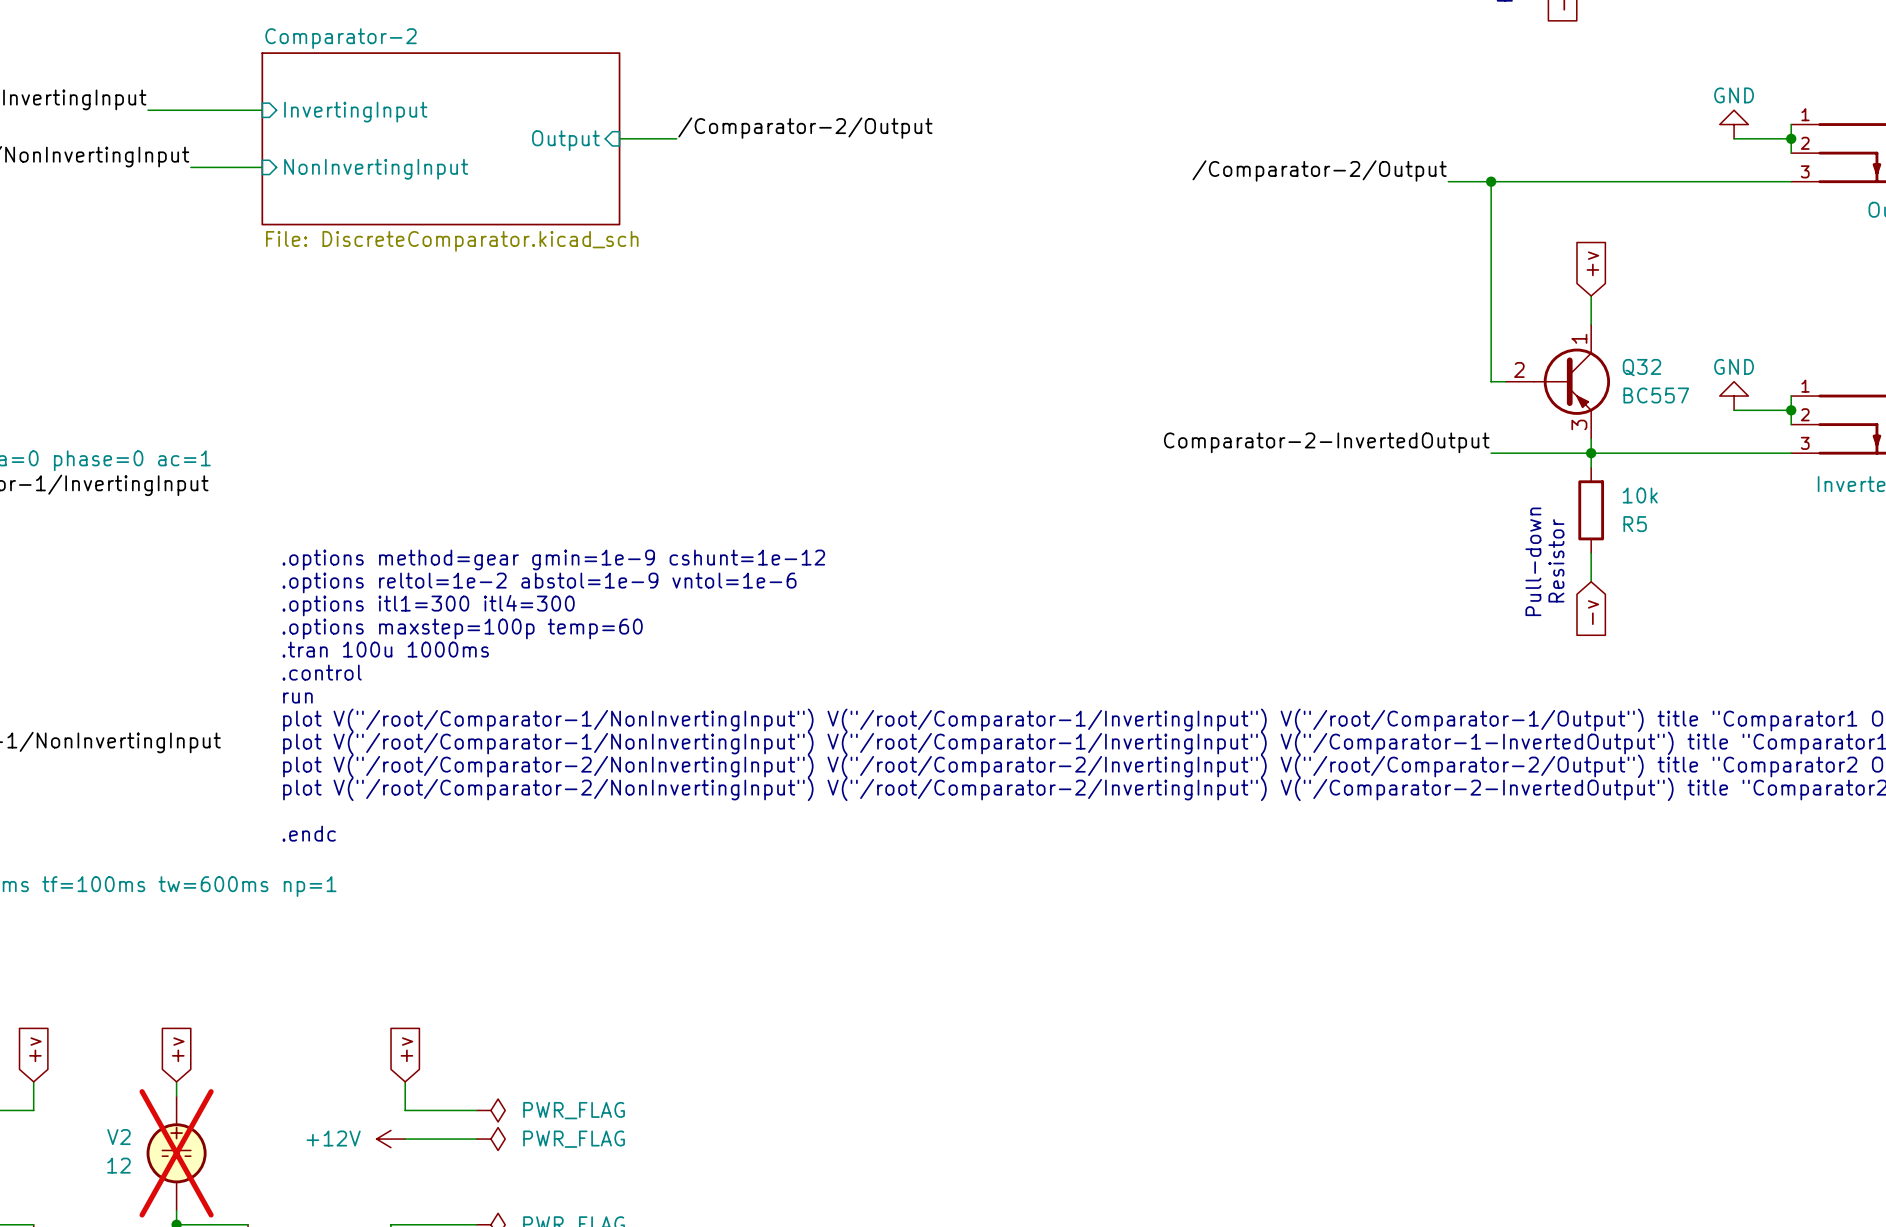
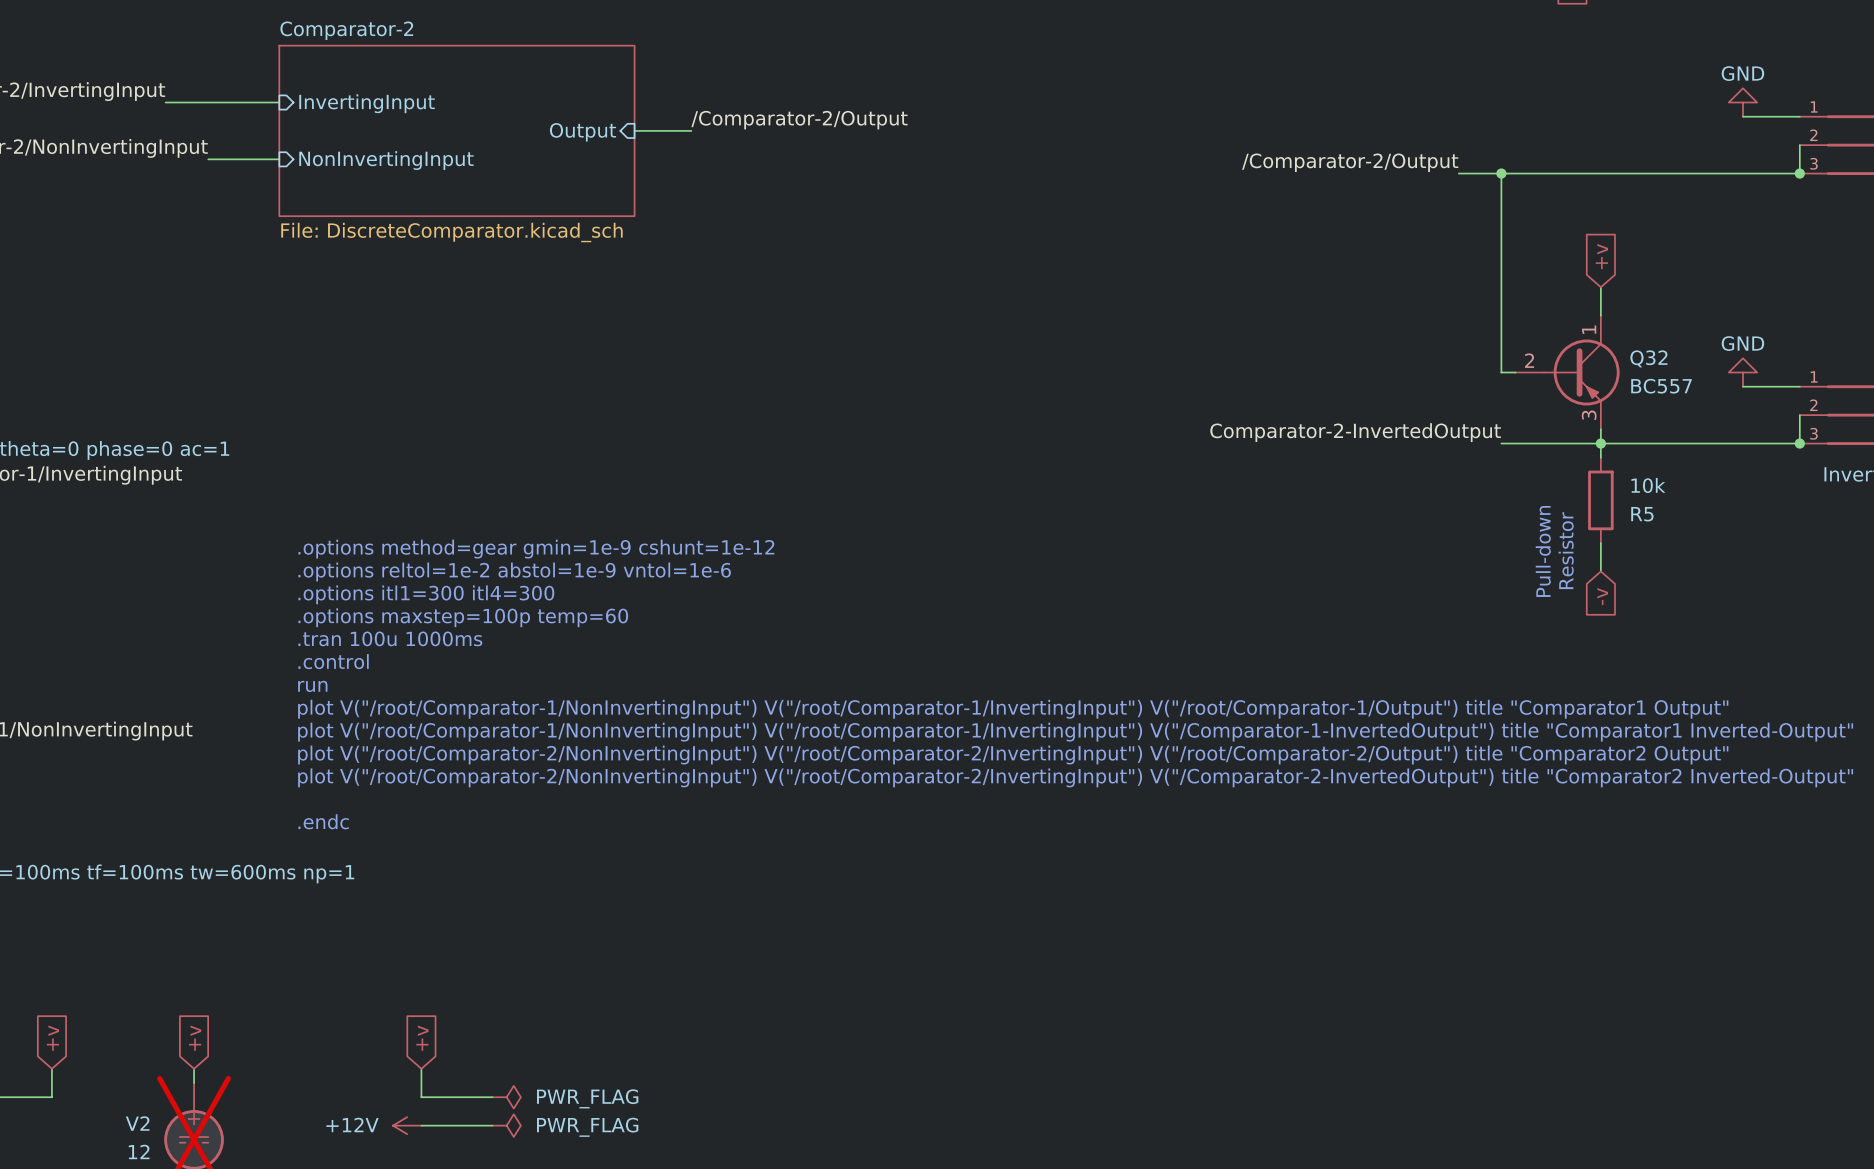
power symbol position: GND (1734, 124) -> GND (1742, 102)
wire: (1791, 124) (1791, 153) -> (1799, 173) (1799, 145)
wire: (1734, 138) (1791, 138) -> (1742, 116) (1799, 116)
junction position: (1791, 138) -> (1799, 173)
power symbol position: GND (1734, 396) -> GND (1742, 372)
wire: (1791, 396) (1791, 424) -> (1799, 443) (1799, 415)
wire: (1734, 410) (1791, 410) -> (1742, 386) (1799, 386)
junction position: (1791, 410) -> (1799, 443)

